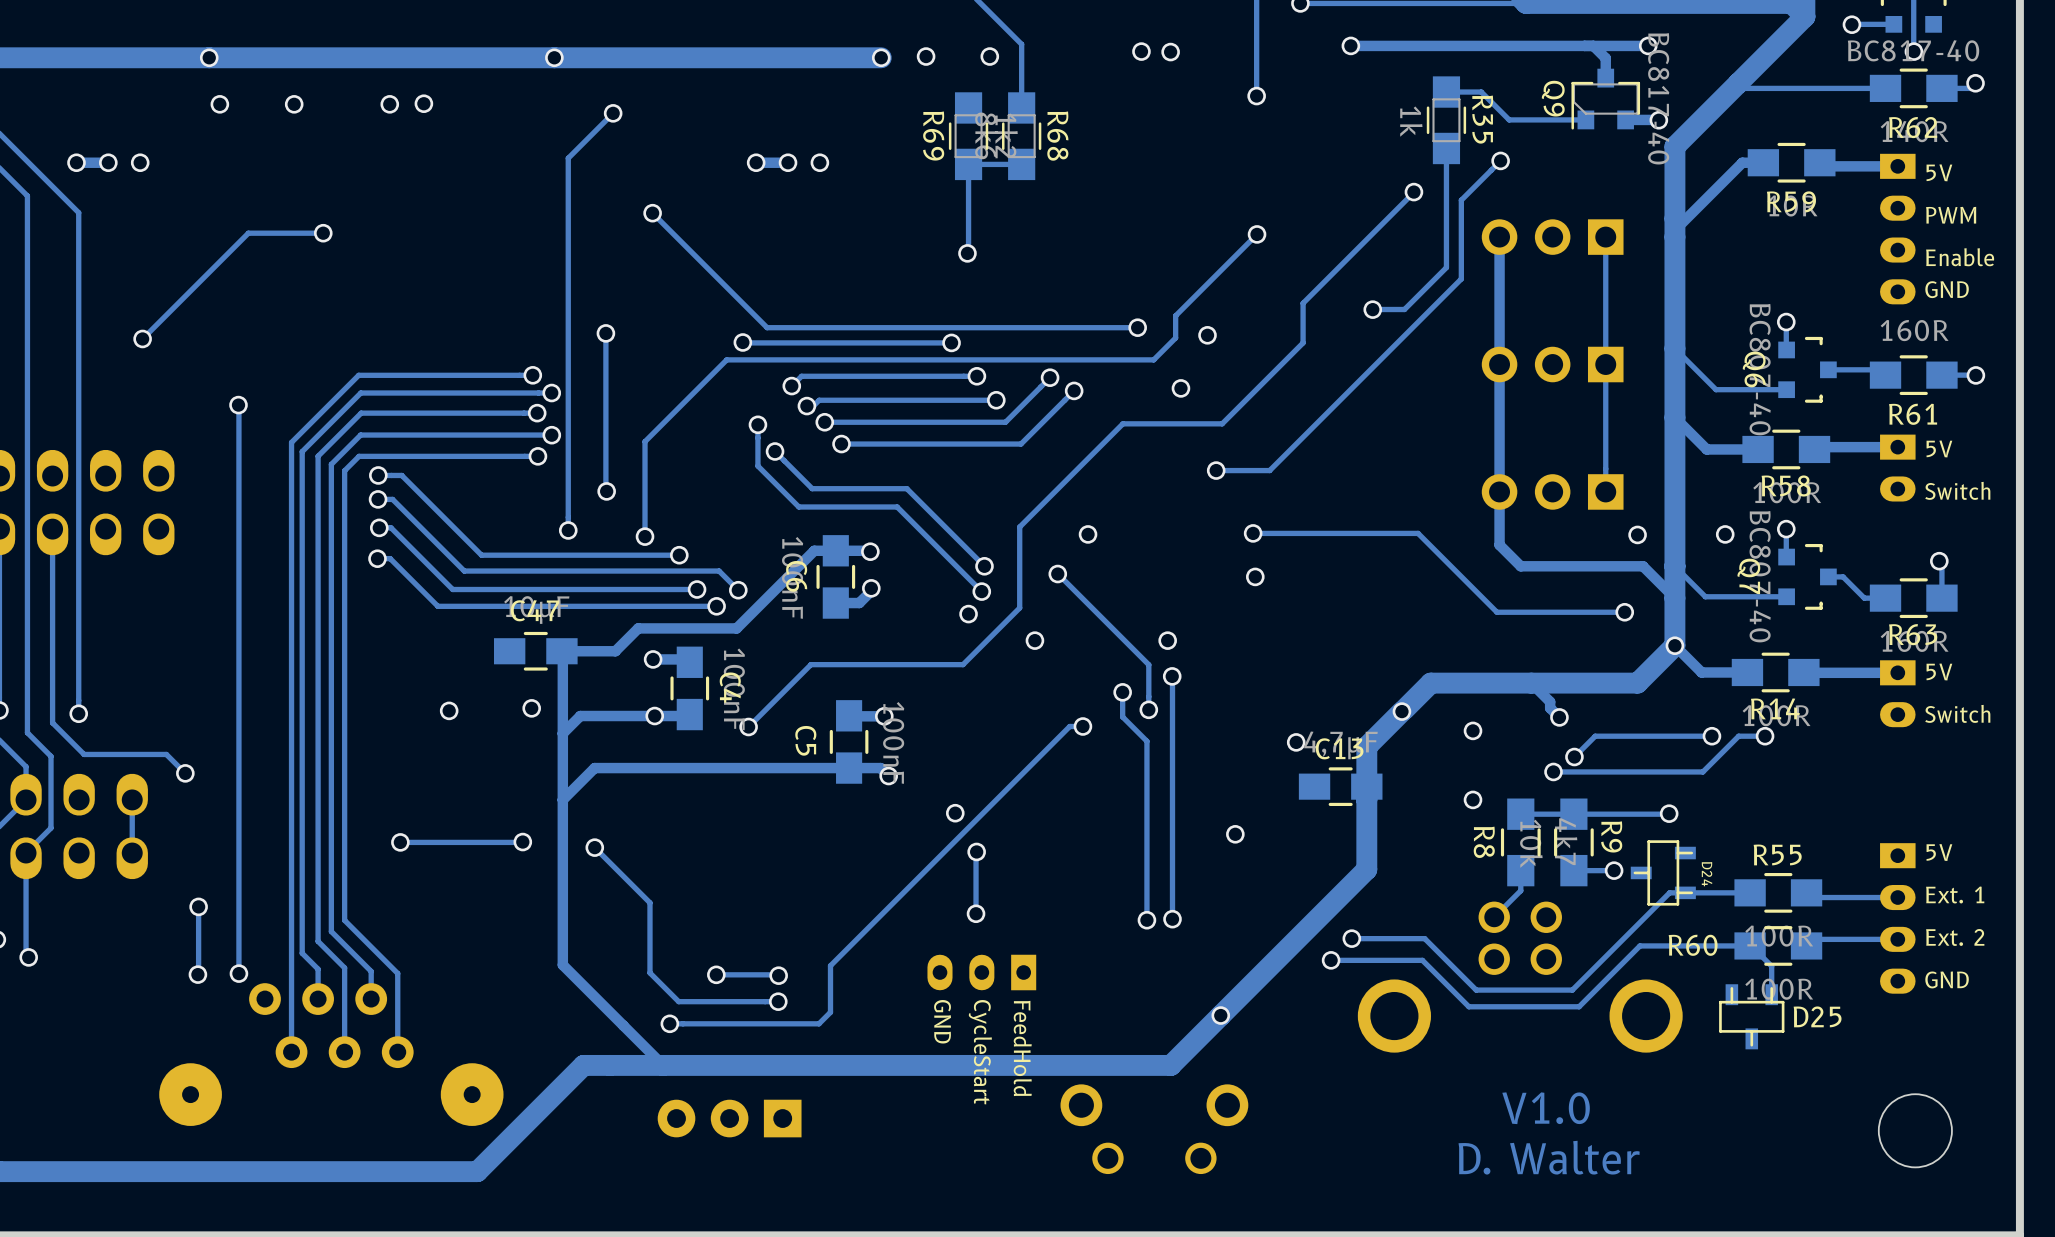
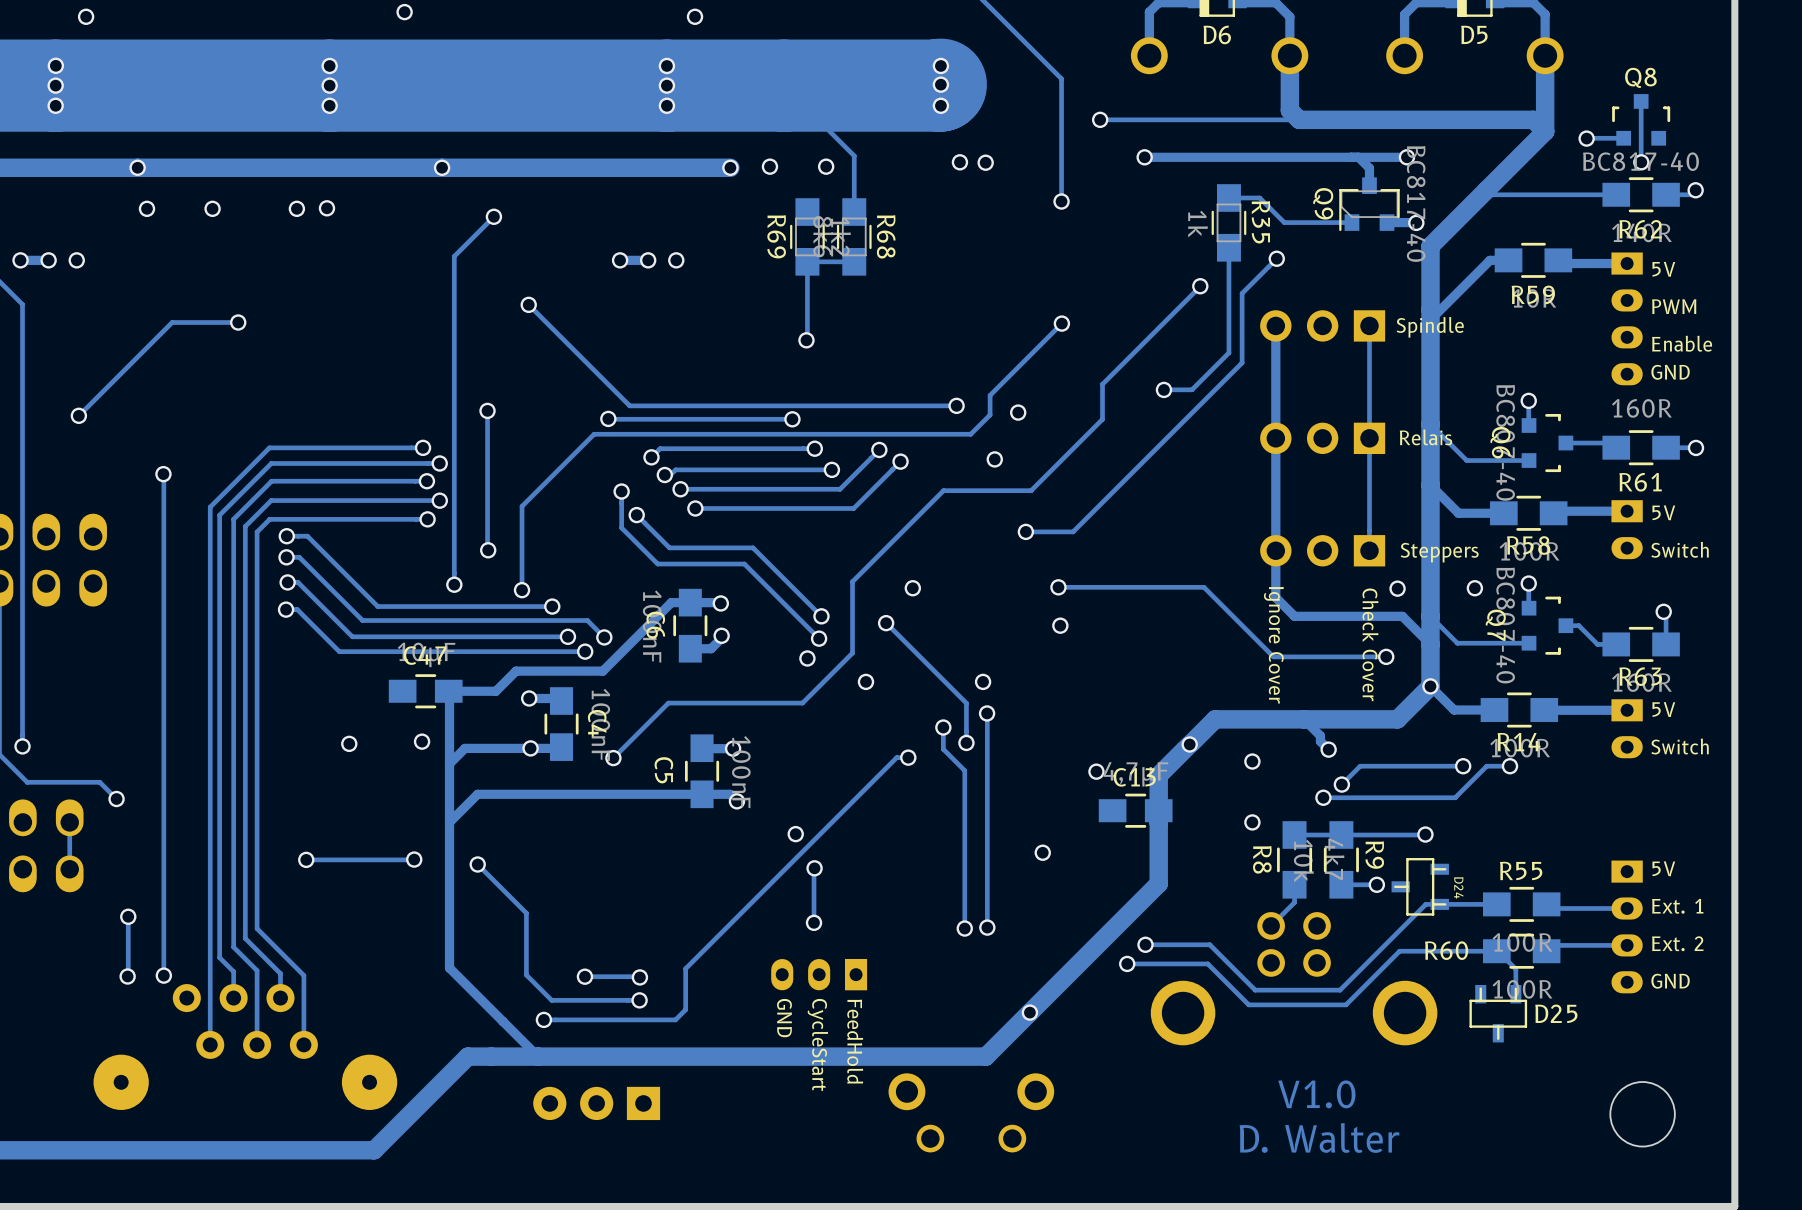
text: none -> Spindle (1430, 327)
text: none -> Relais (1425, 437)
text: none -> Steppers (1439, 552)
text: none -> Check Cover (1370, 644)
text: none -> Ignore Cover (1273, 645)

